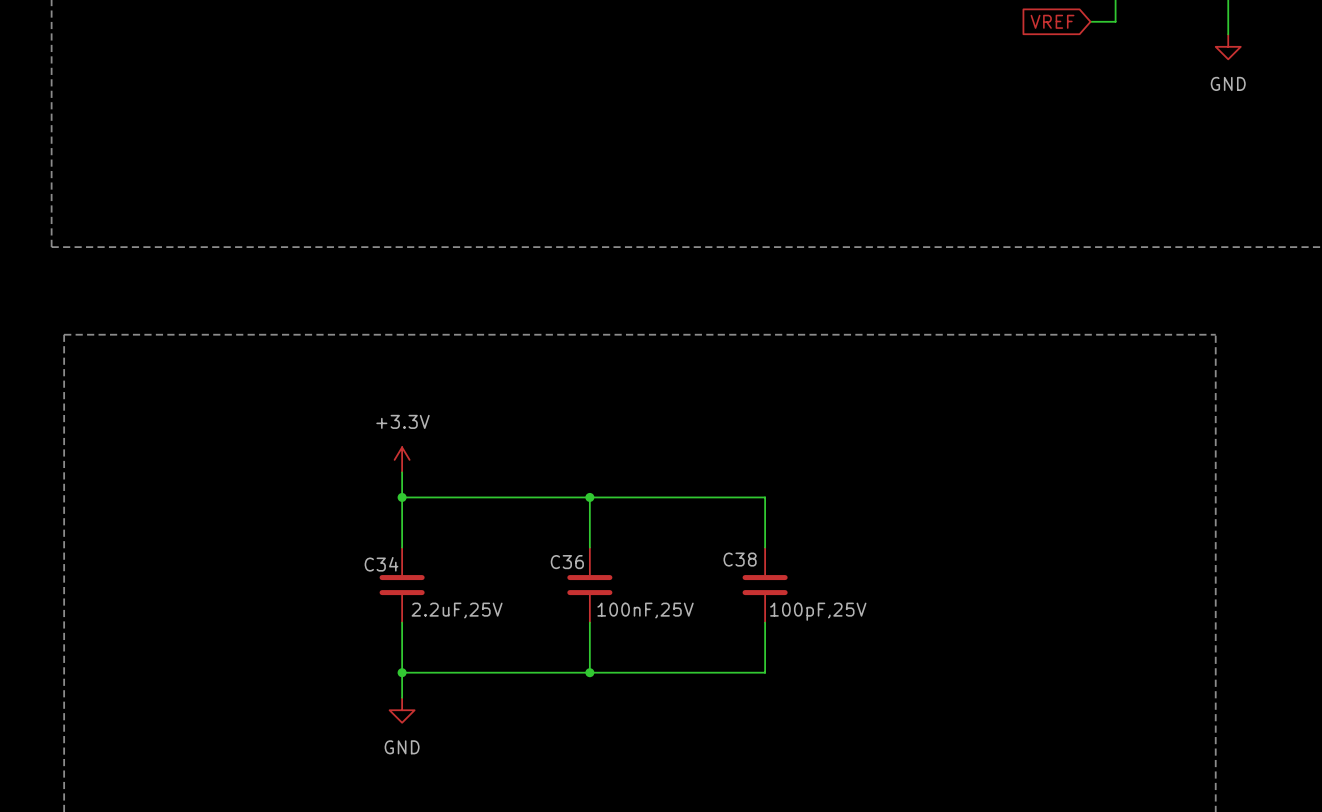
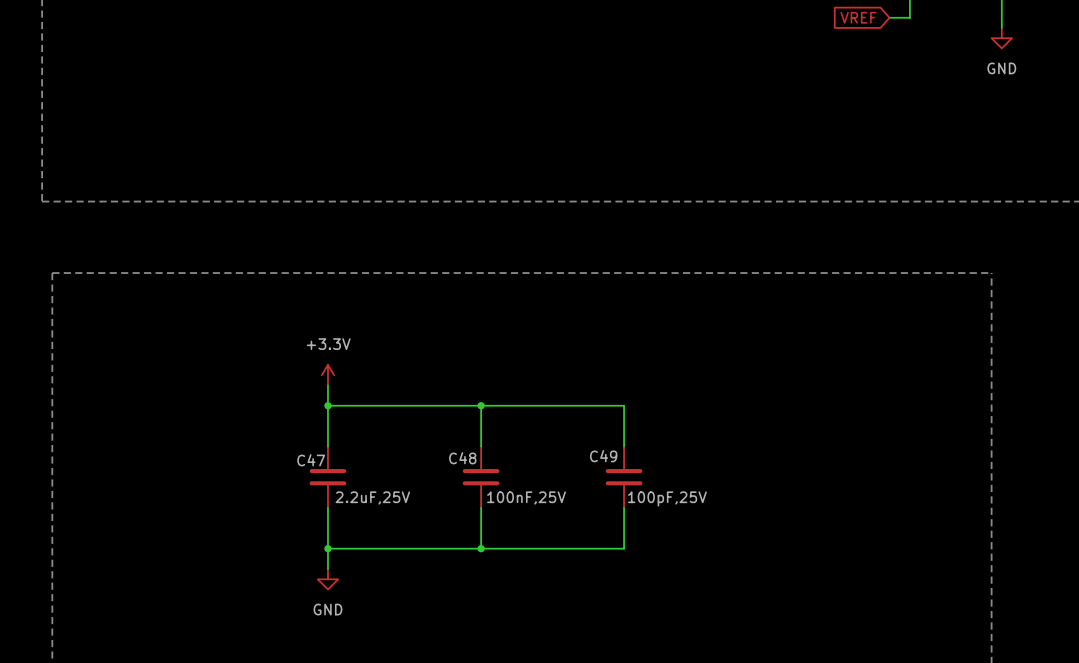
C38 name: C38 (740, 559) -> C49 (603, 456)
C36 name: C36 (567, 562) -> C48 (462, 458)
C34 name: C34 (381, 564) -> C47 (311, 460)

